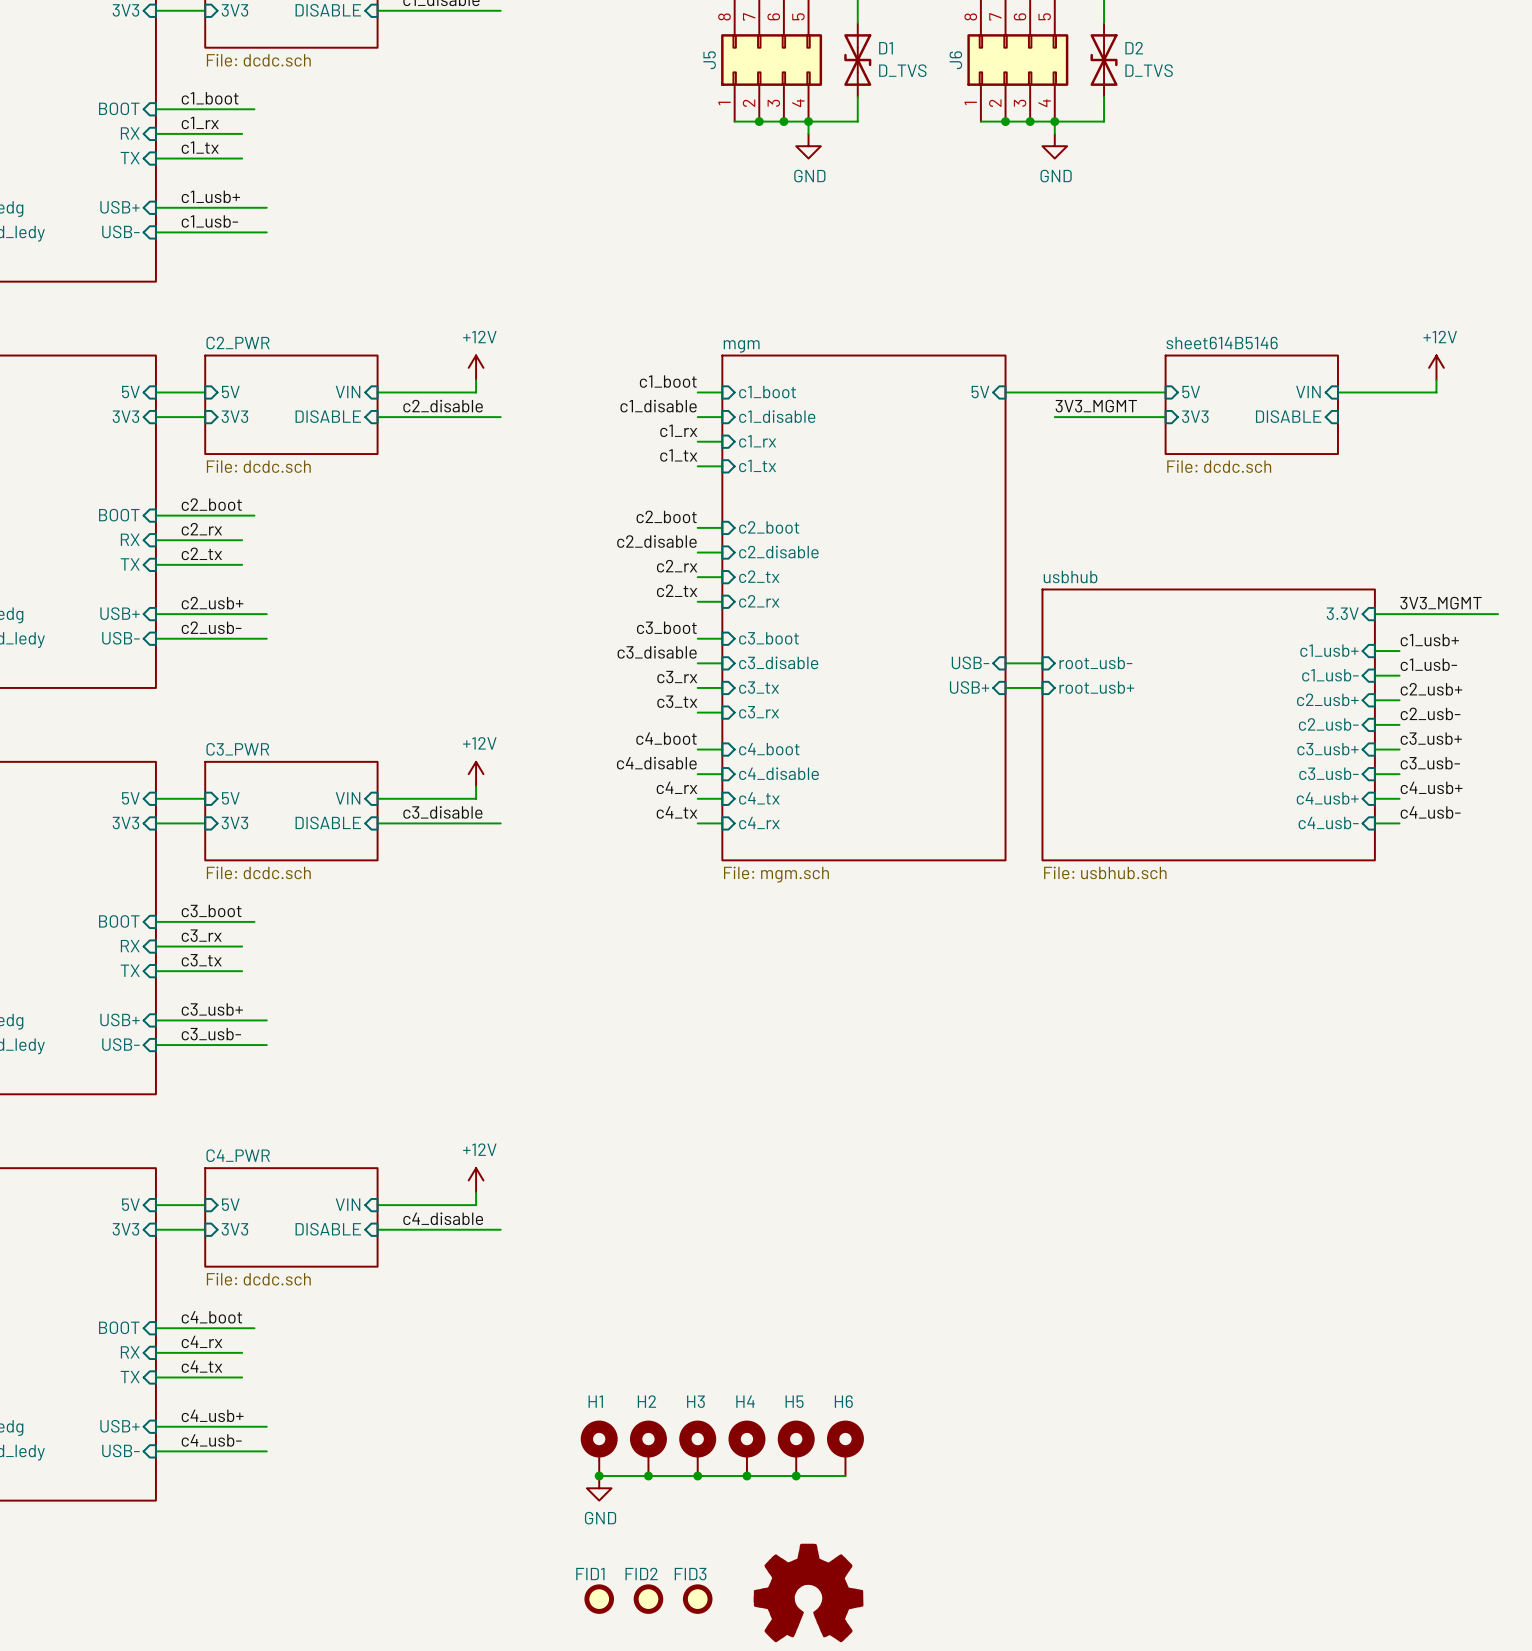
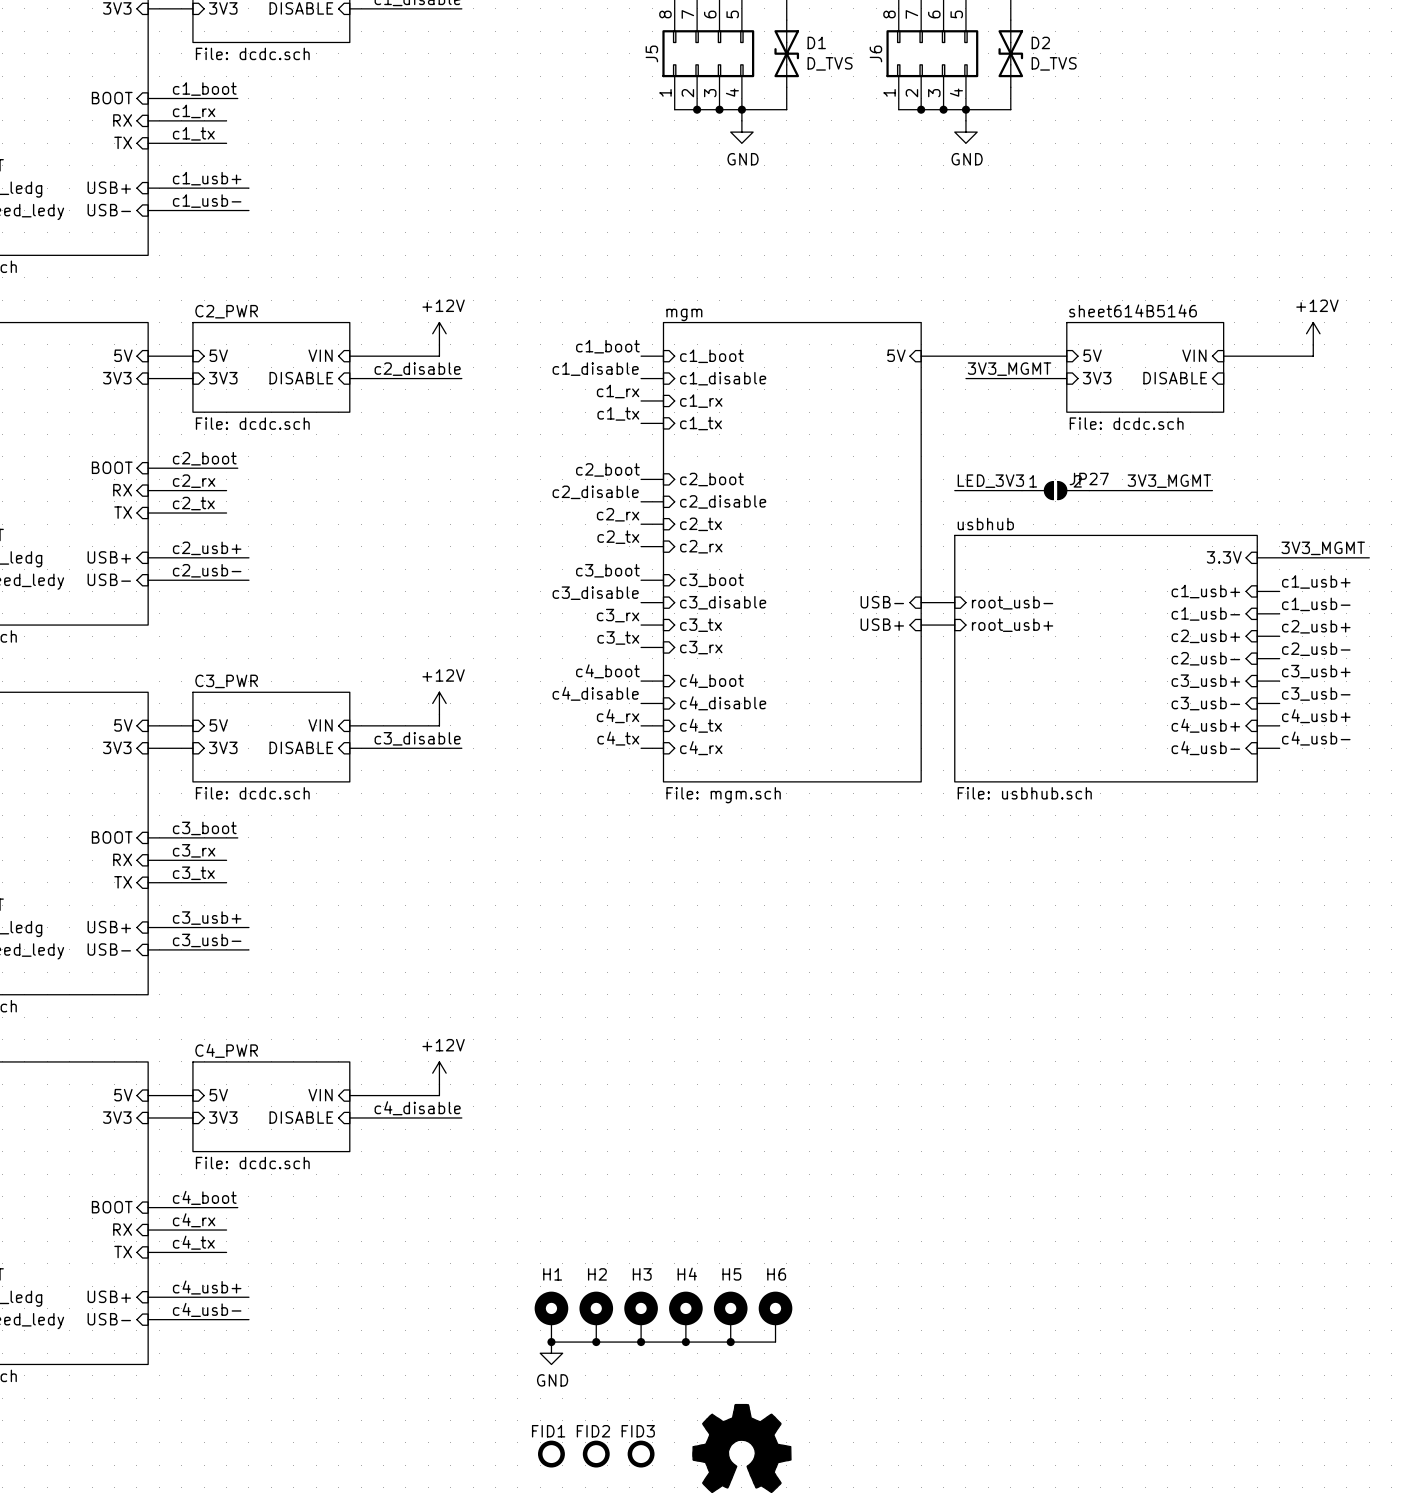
label: none -> LED_3V3 (990, 481)
label: none -> 3V3_MGMT (1169, 481)
wire: none -> (954, 490) (1021, 490)
JP27: none -> (1055, 490)
wire: none -> (1089, 490) (1212, 490)

